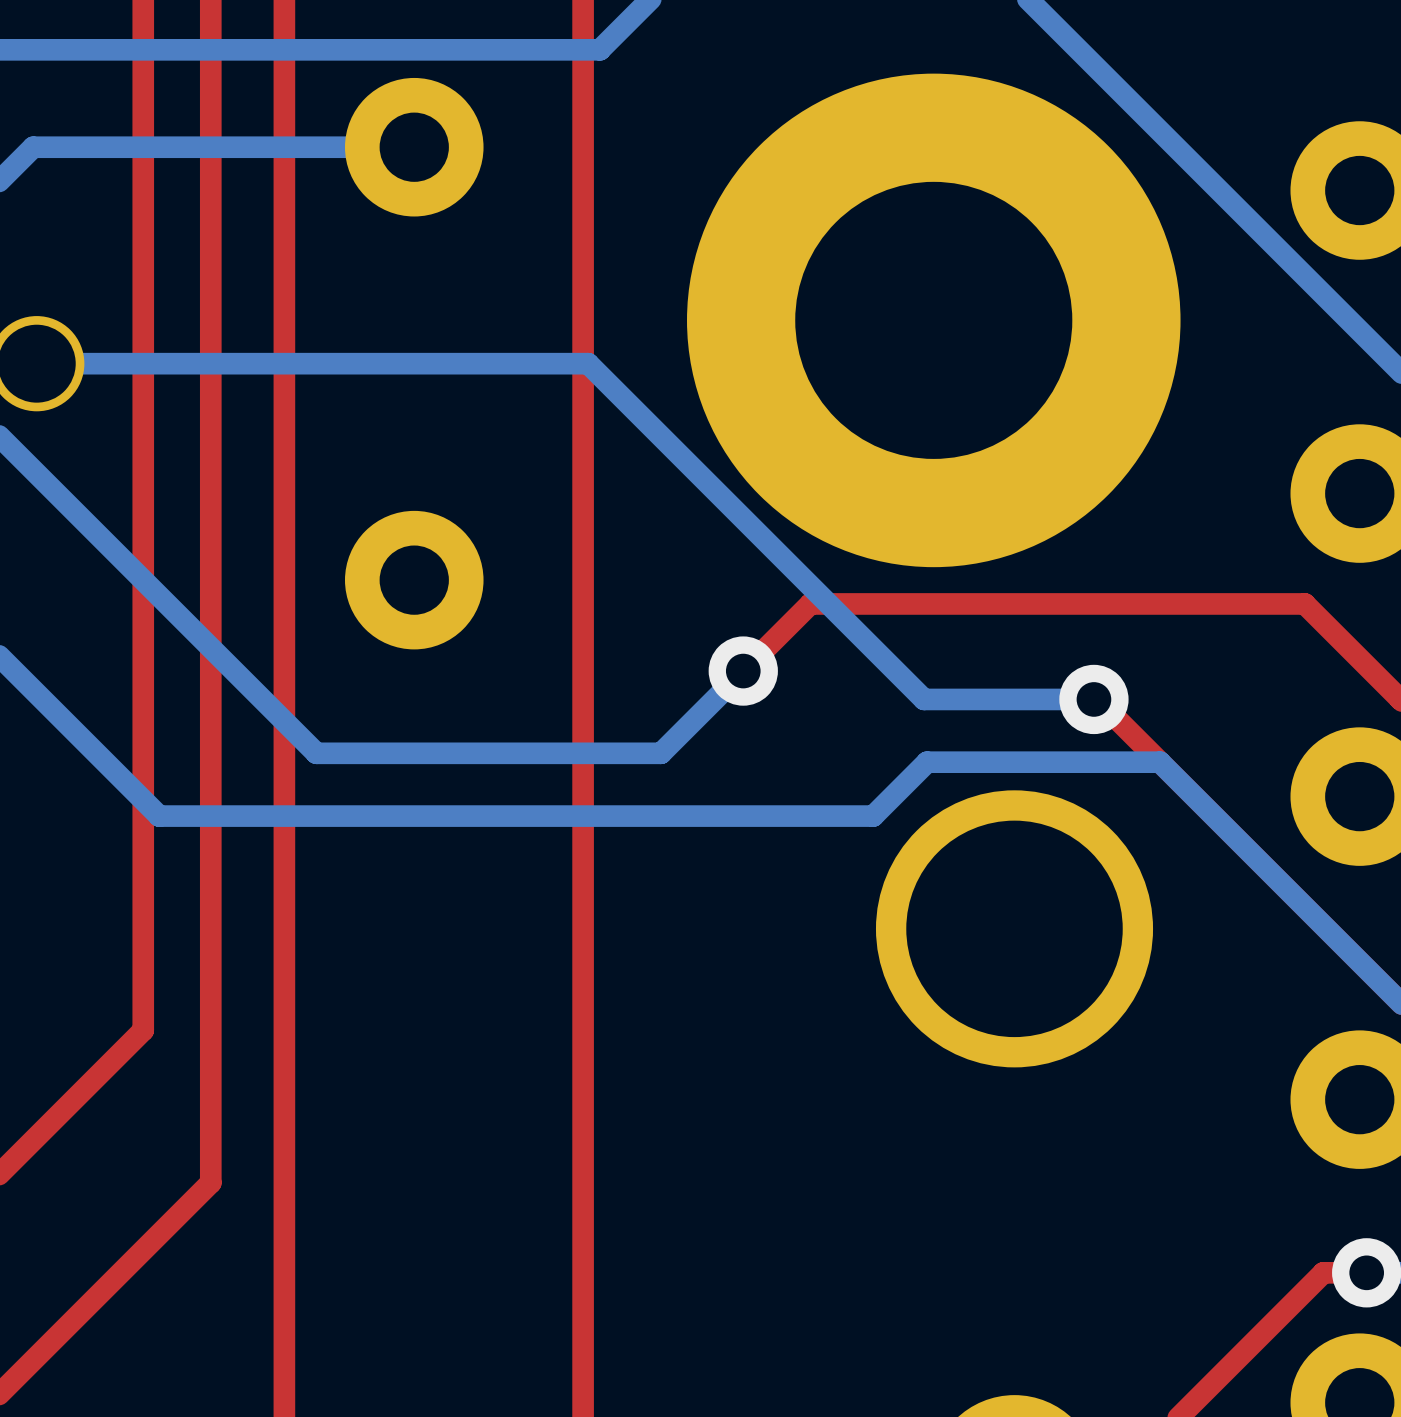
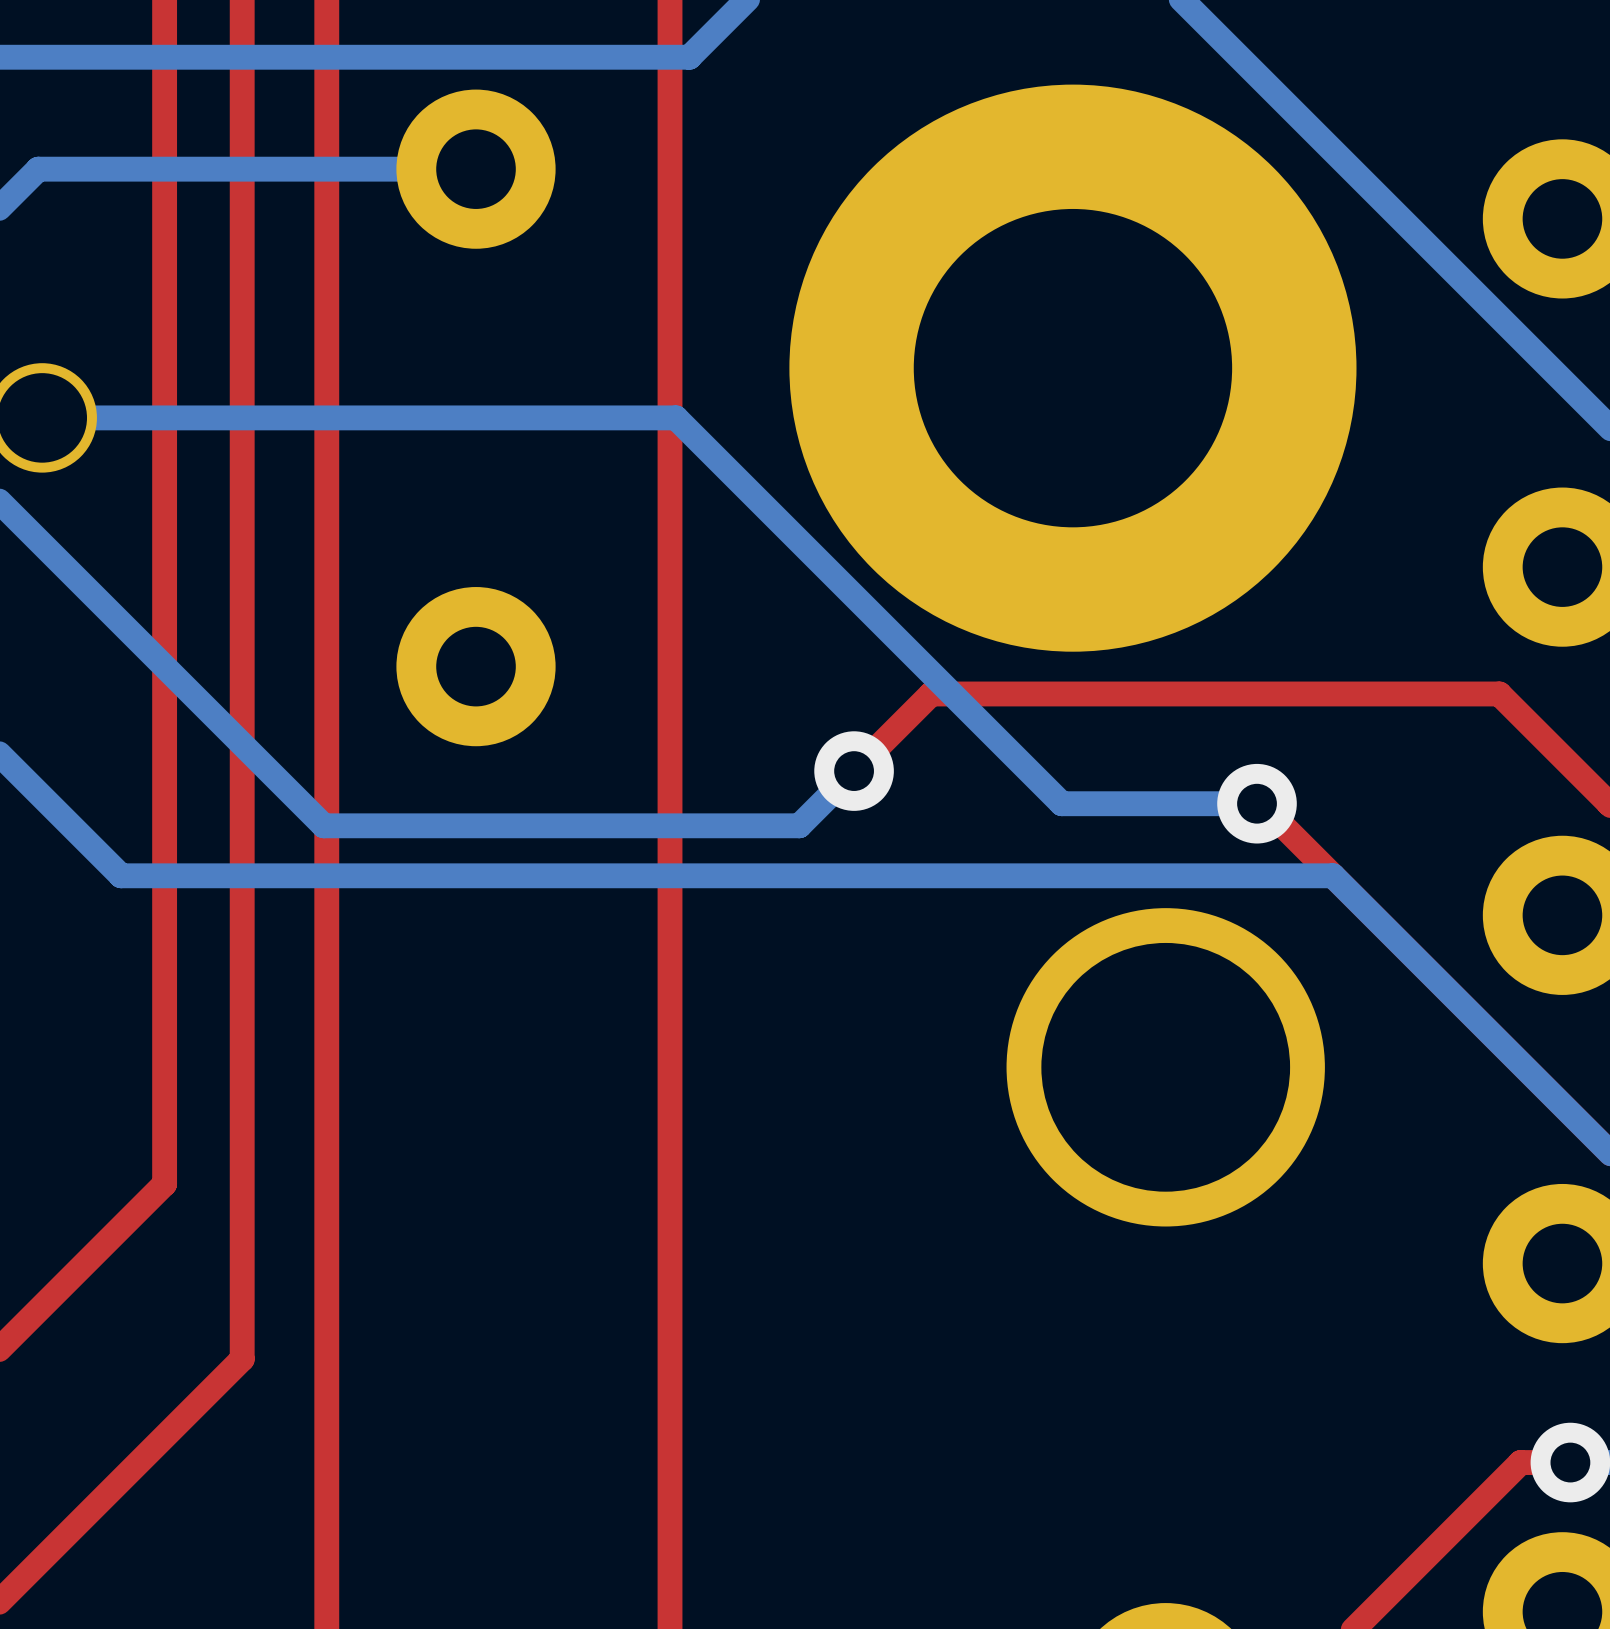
bottom track: (695, 718) (661, 753) (316, 753) (281, 718) -> (799, 825) (323, 825)
bottom track: (927, 762) (873, 816) (159, 816) (105, 762) -> (1065, 875) (121, 875)

